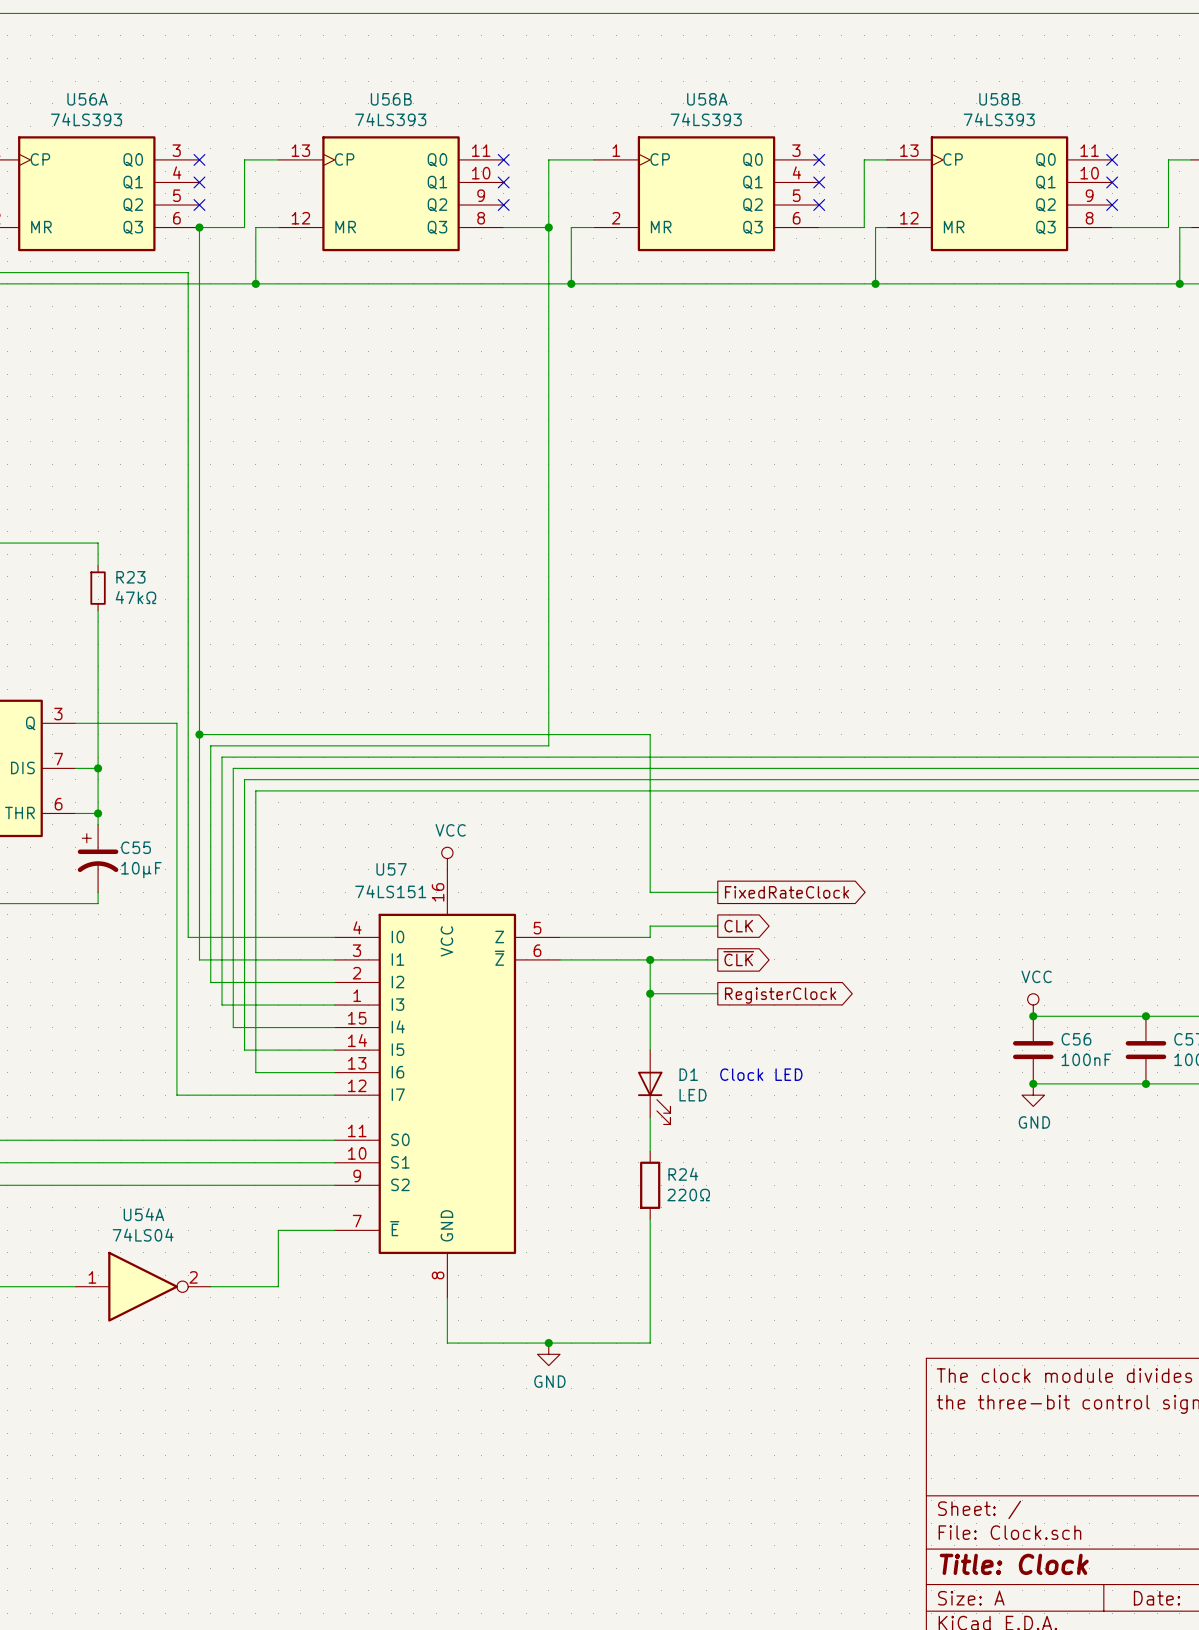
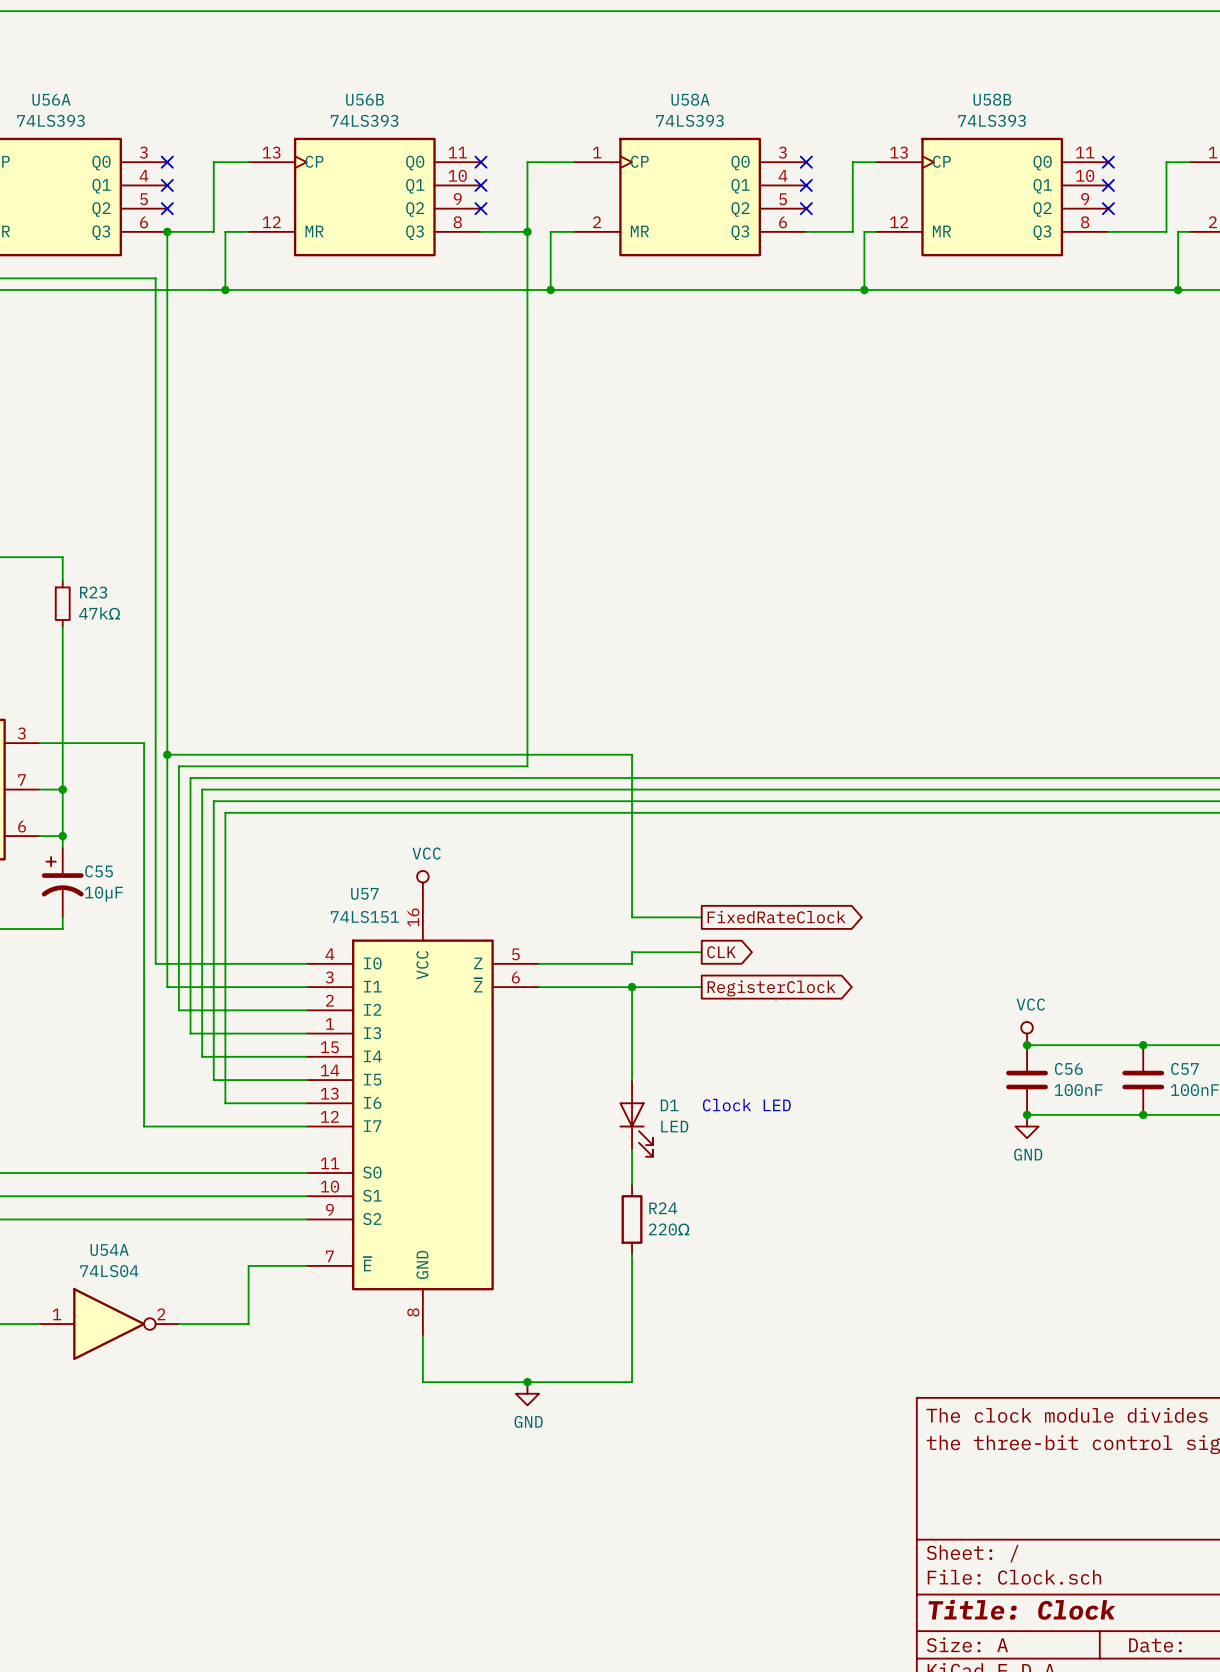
global label: ~{CLK} (738, 958) -> RegisterClock (771, 988)
wire: (650, 993) (717, 993) -> none
junction: (650, 993) -> none
global label: RegisterClock (780, 995) -> none

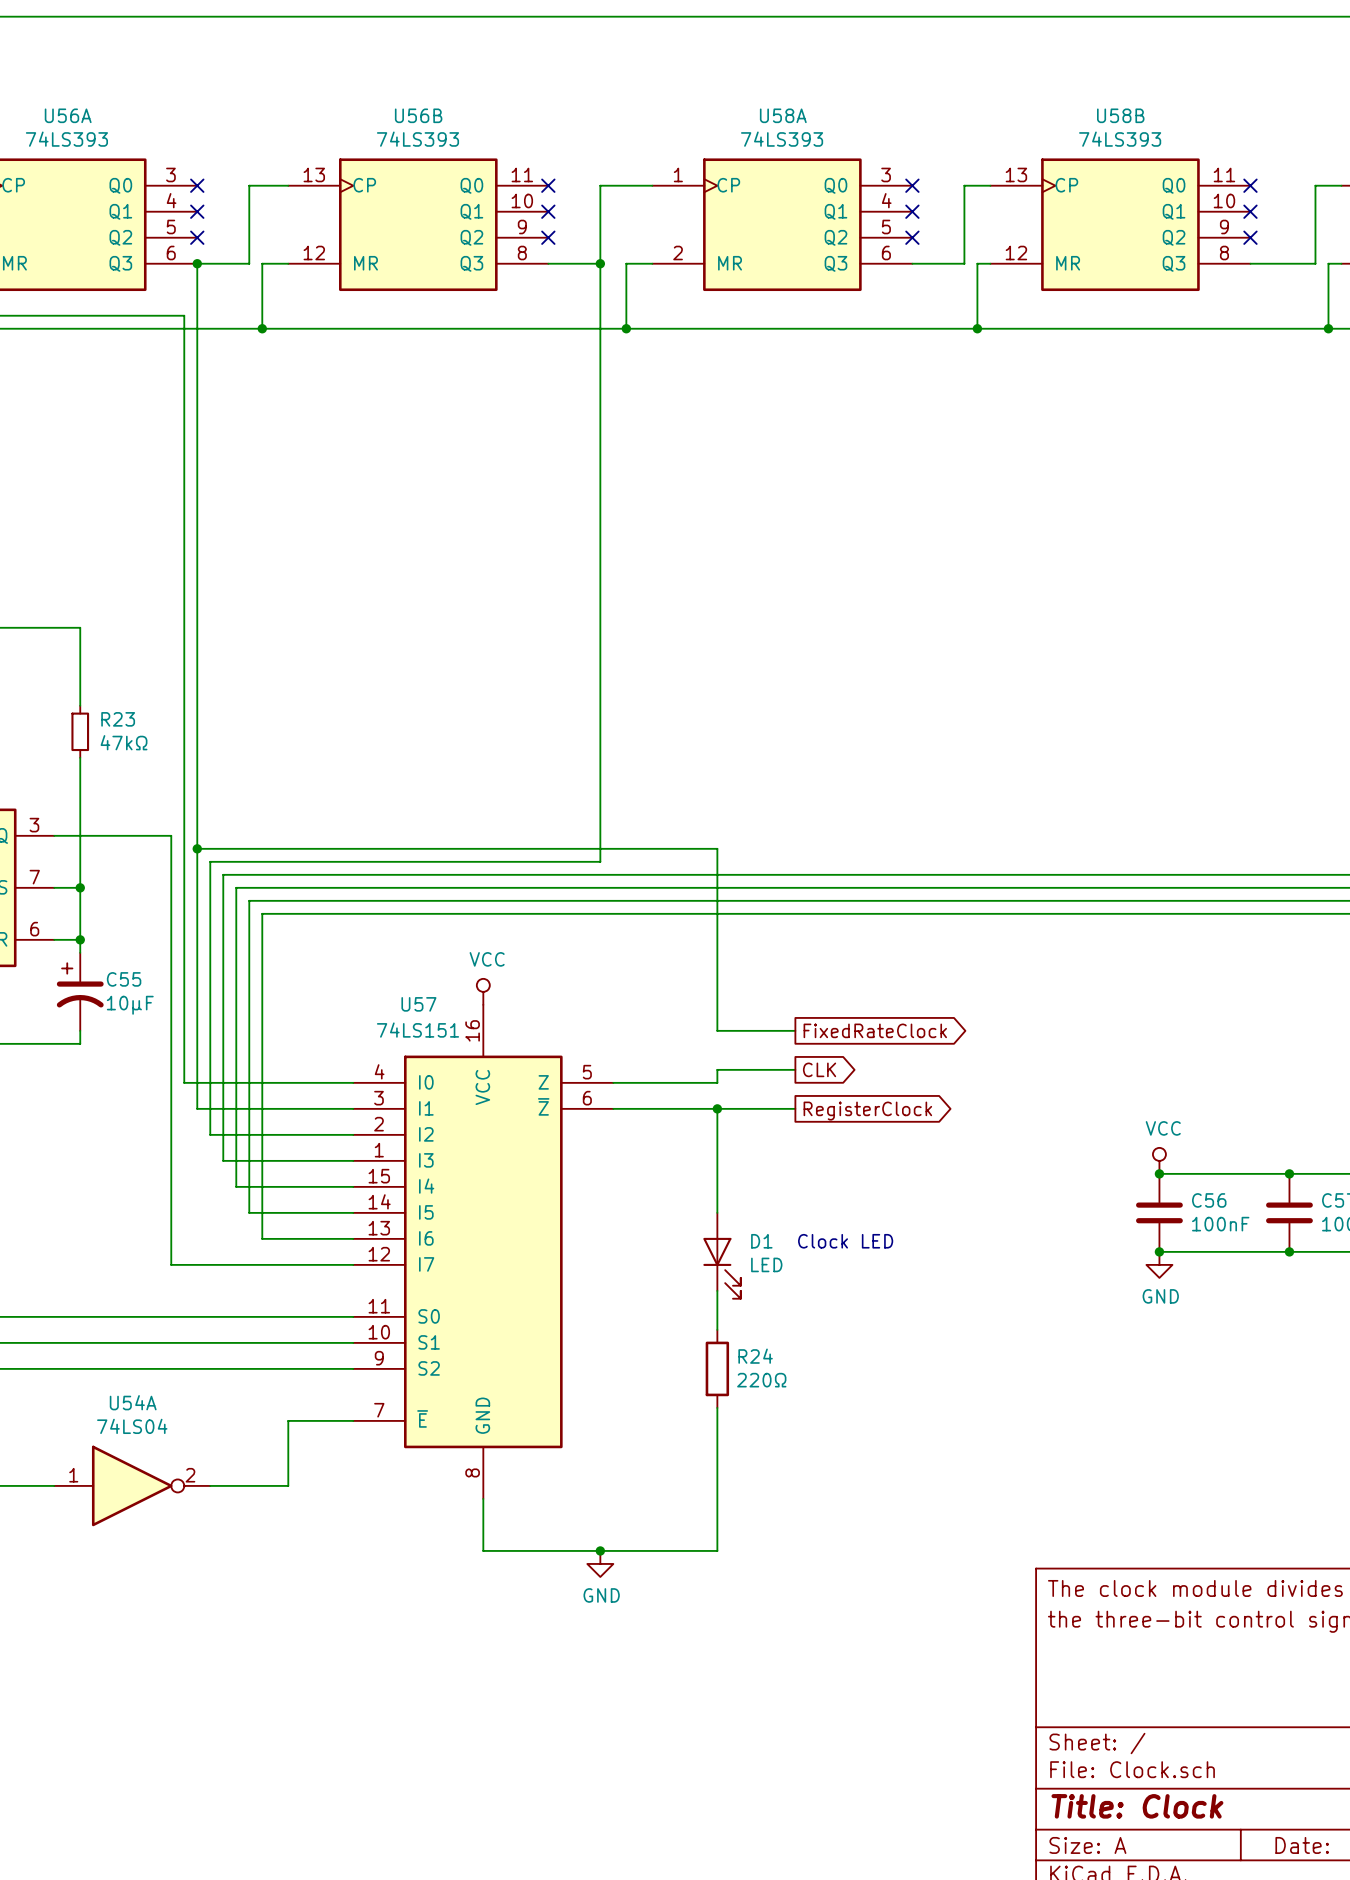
R23 position: (62, 603) -> (80, 731)
wire: (62, 626) (62, 673) -> (80, 705) (80, 653)

